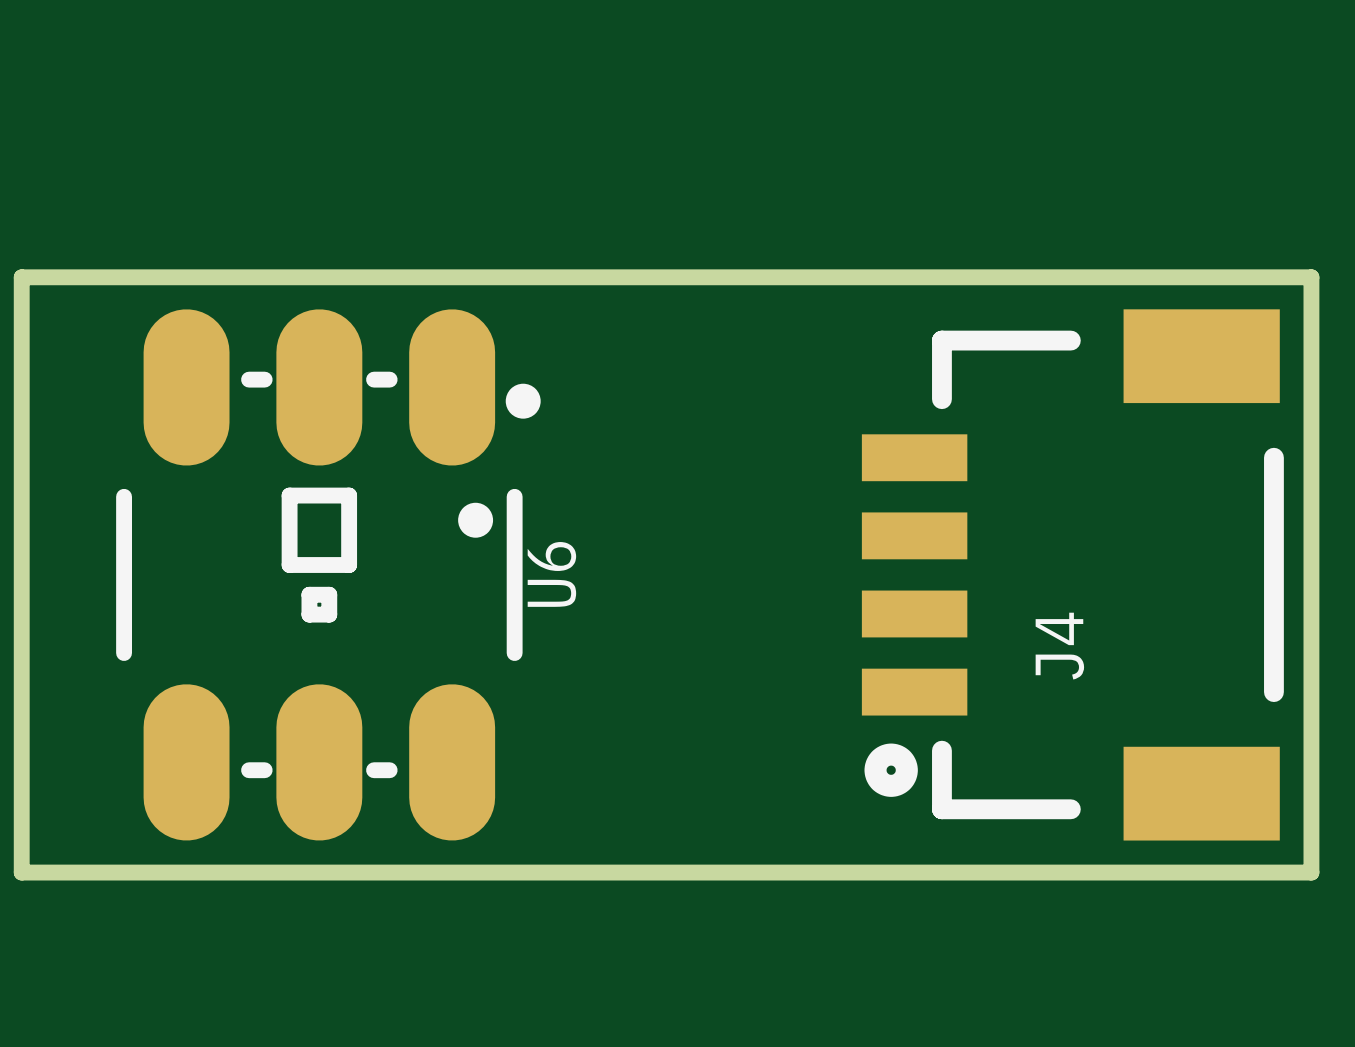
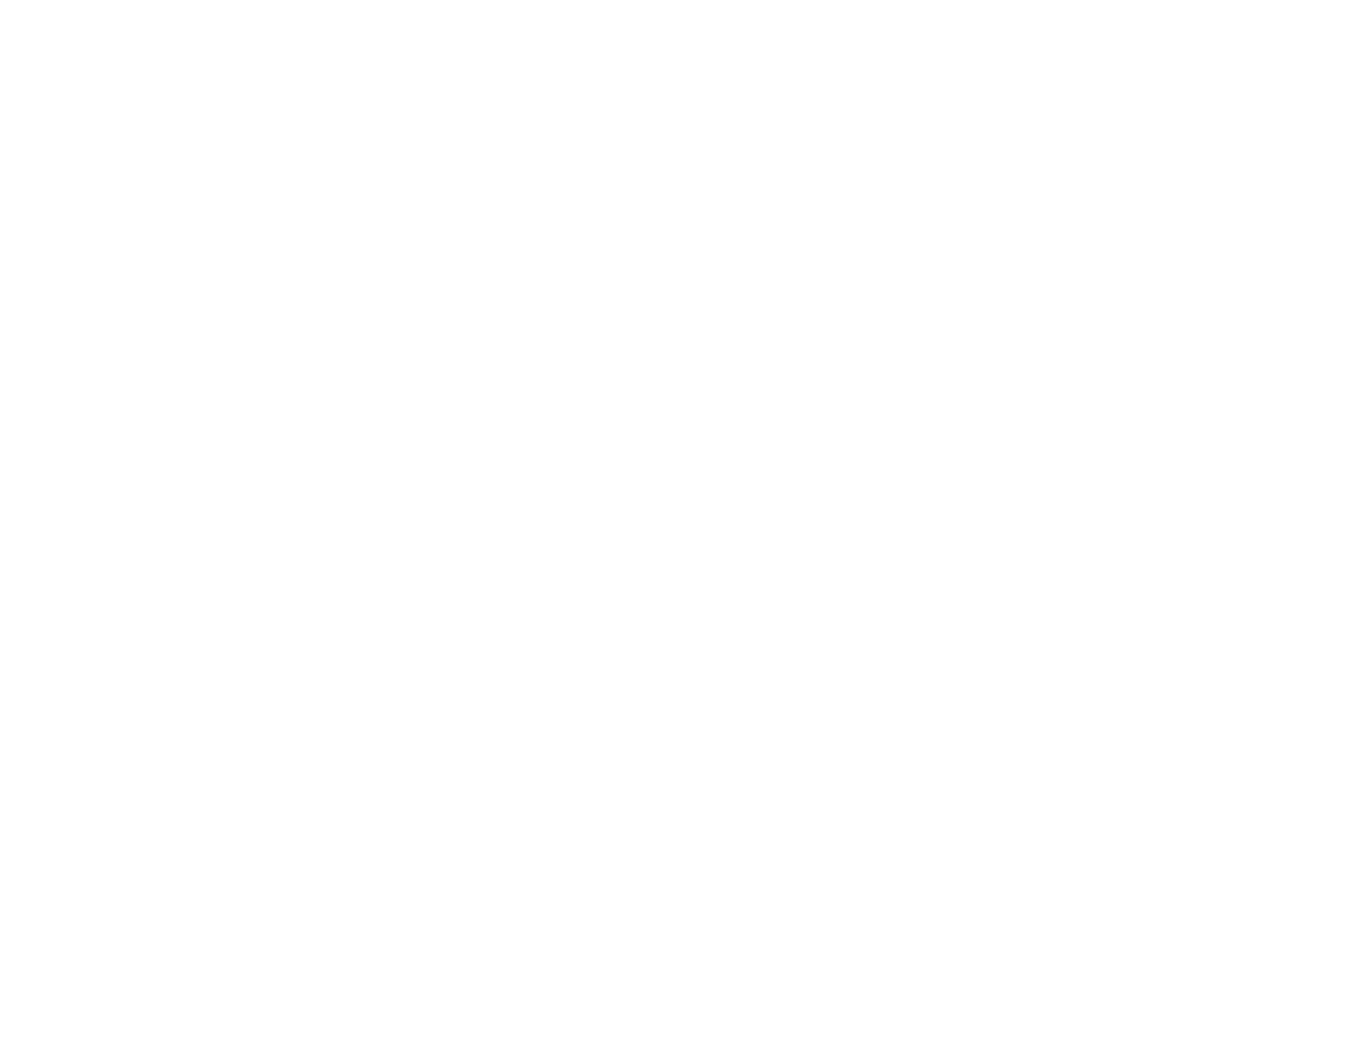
board edge: (21, 277) (1311, 277) (1311, 872) (21, 872) (21, 277) -> none
U6: (328, 574) -> none
J4: (1072, 574) -> none

